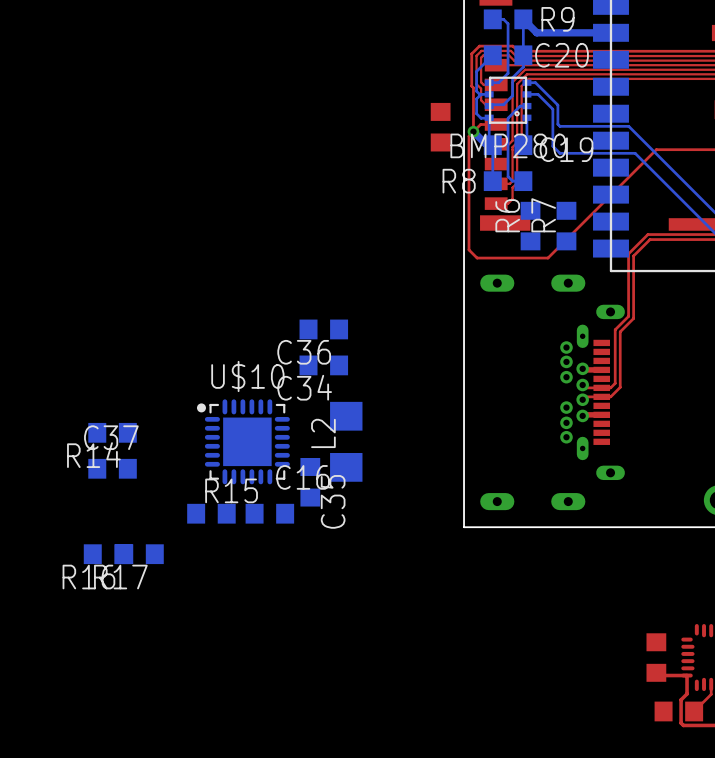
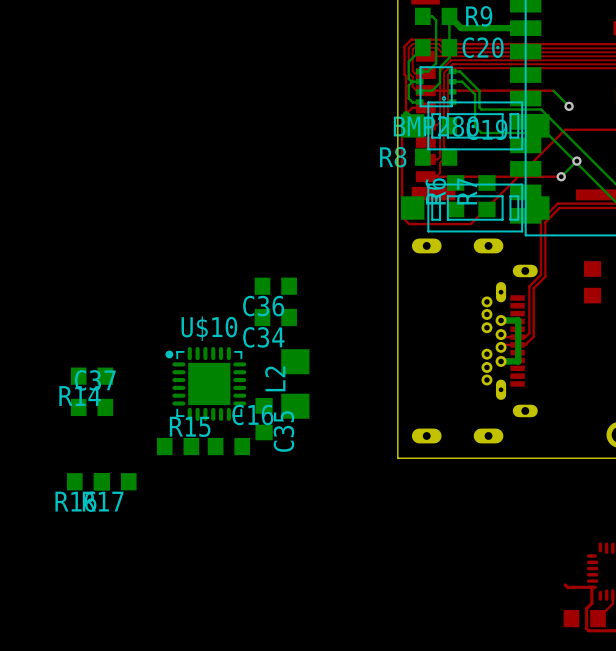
top track: none -> (553, 90) (425, 90)
bottom track: none -> (553, 90) (569, 106)
bottom track: (526, 106) (520, 106) (508, 118) (508, 176) (512, 181) (523, 181) -> none
bottom track: (489, 117) (489, 141) (492, 145) (492, 181) -> none
bottom track: (526, 117) (526, 141) (523, 145) -> none
via: none -> (569, 106)
part: (440, 127) -> none
via: (473, 131) -> none
part: none -> (475, 125)
bottom track: none -> (576, 161) (561, 176)
via: none -> (576, 161)
top track: none -> (561, 176) (436, 176)
via: none -> (561, 176)
part: none -> (475, 208)
part: none -> (592, 282)
bottom track: none -> (501, 320) (518, 320) (518, 361) (501, 361)
part: (656, 657) -> none

